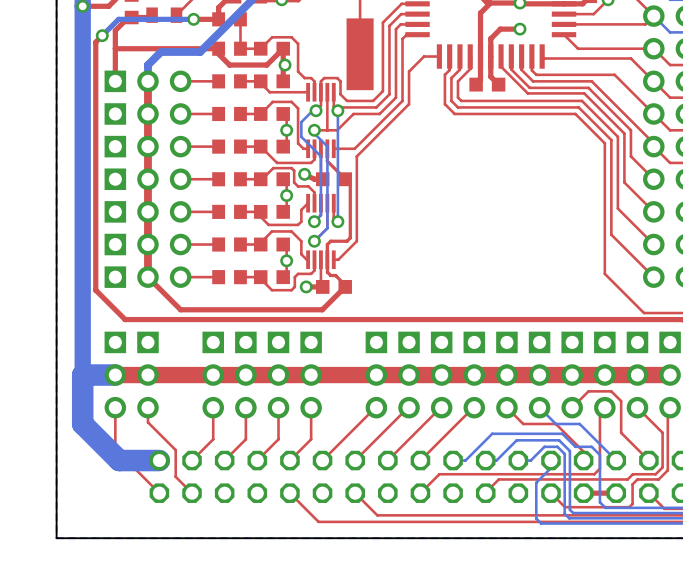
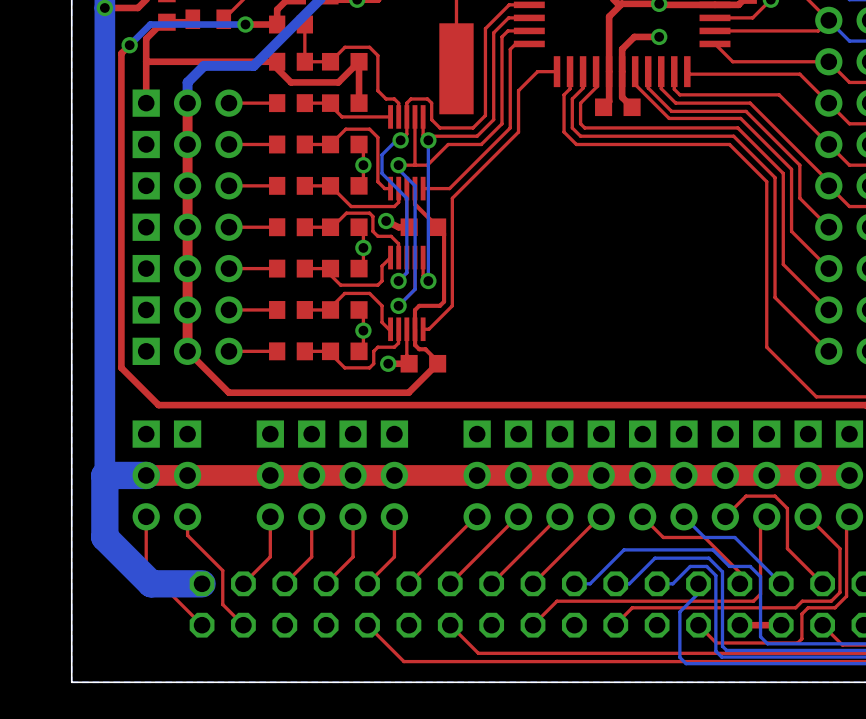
via: (285, 65) -> none

